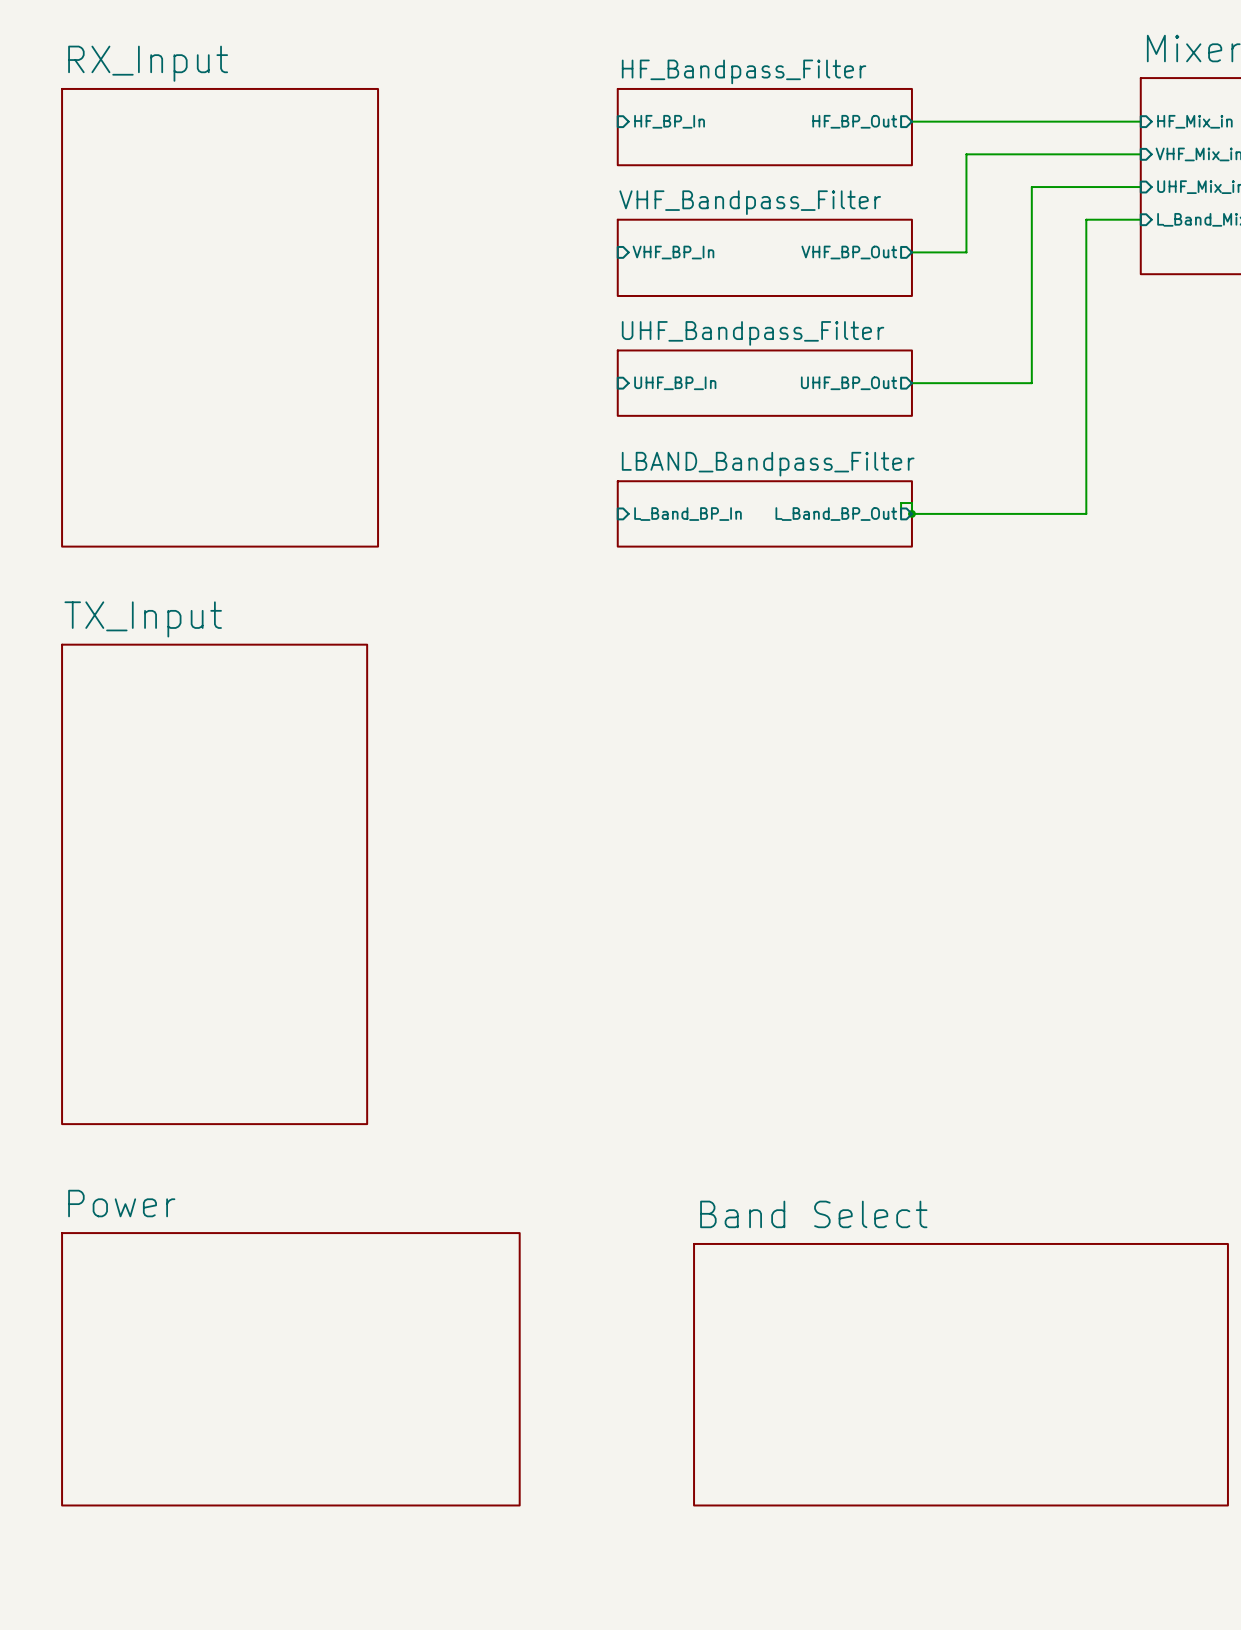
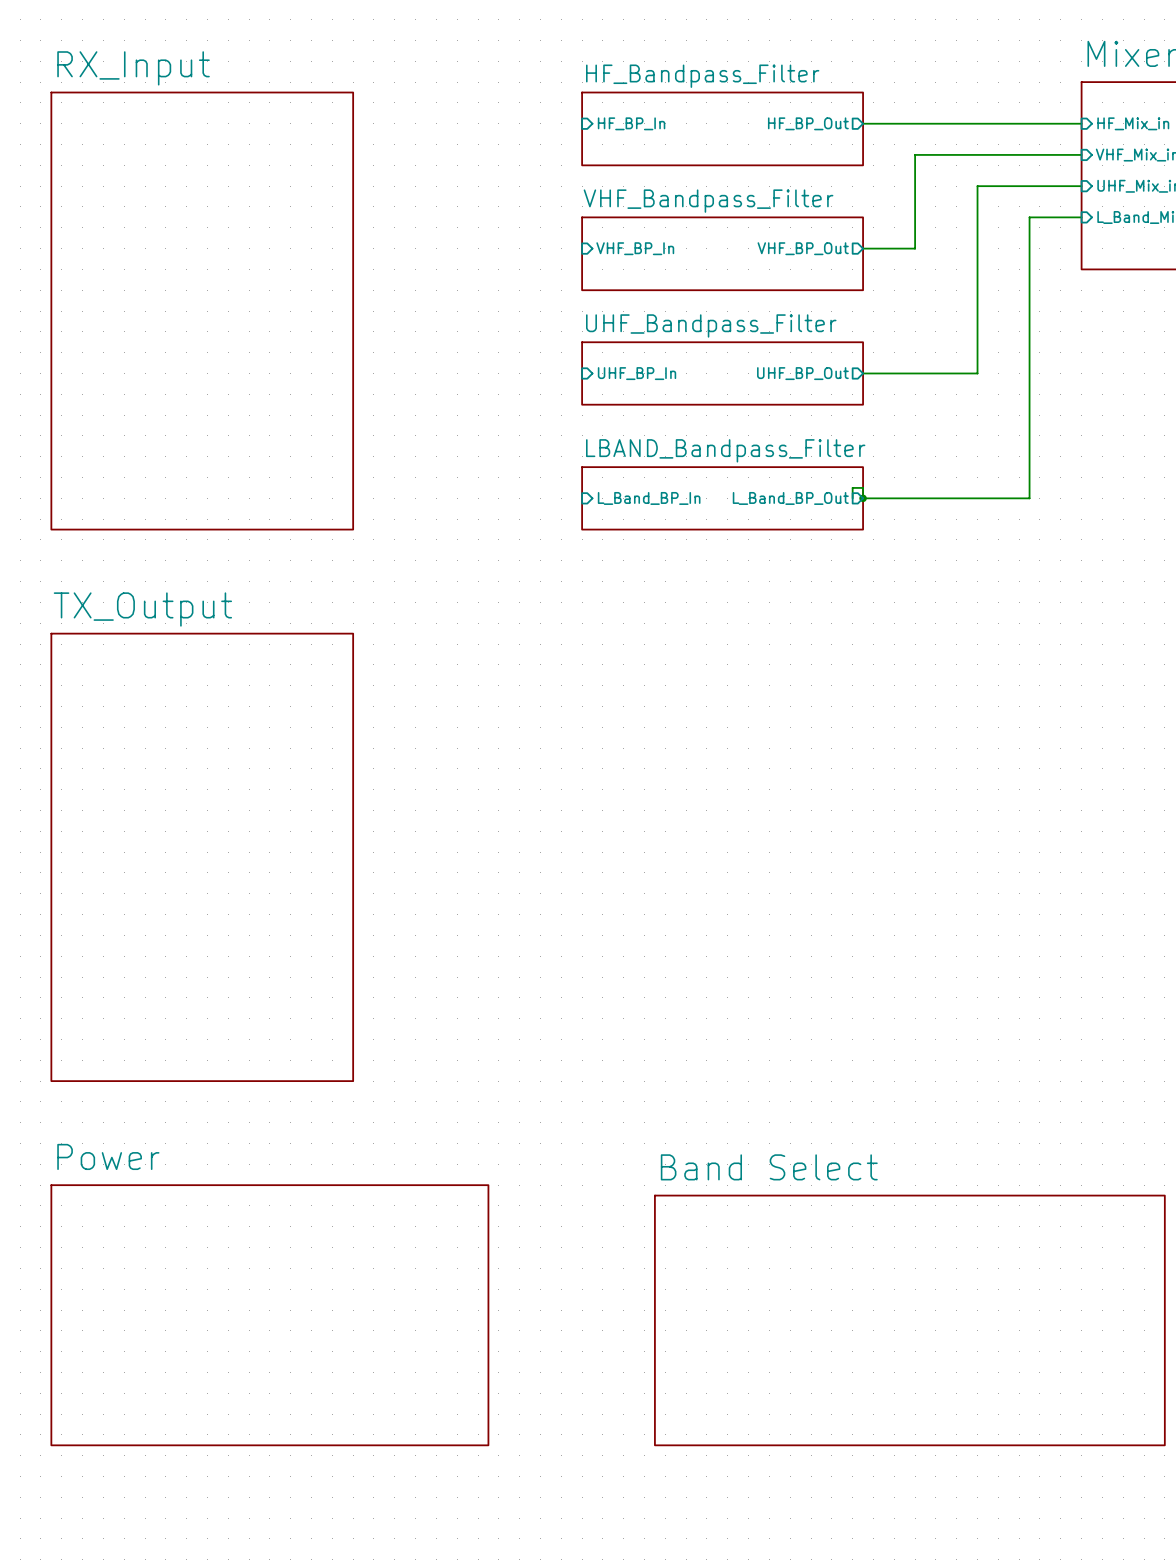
sheet TX_Input: (214, 884) -> none
sheet TX_Output: none -> (202, 857)

